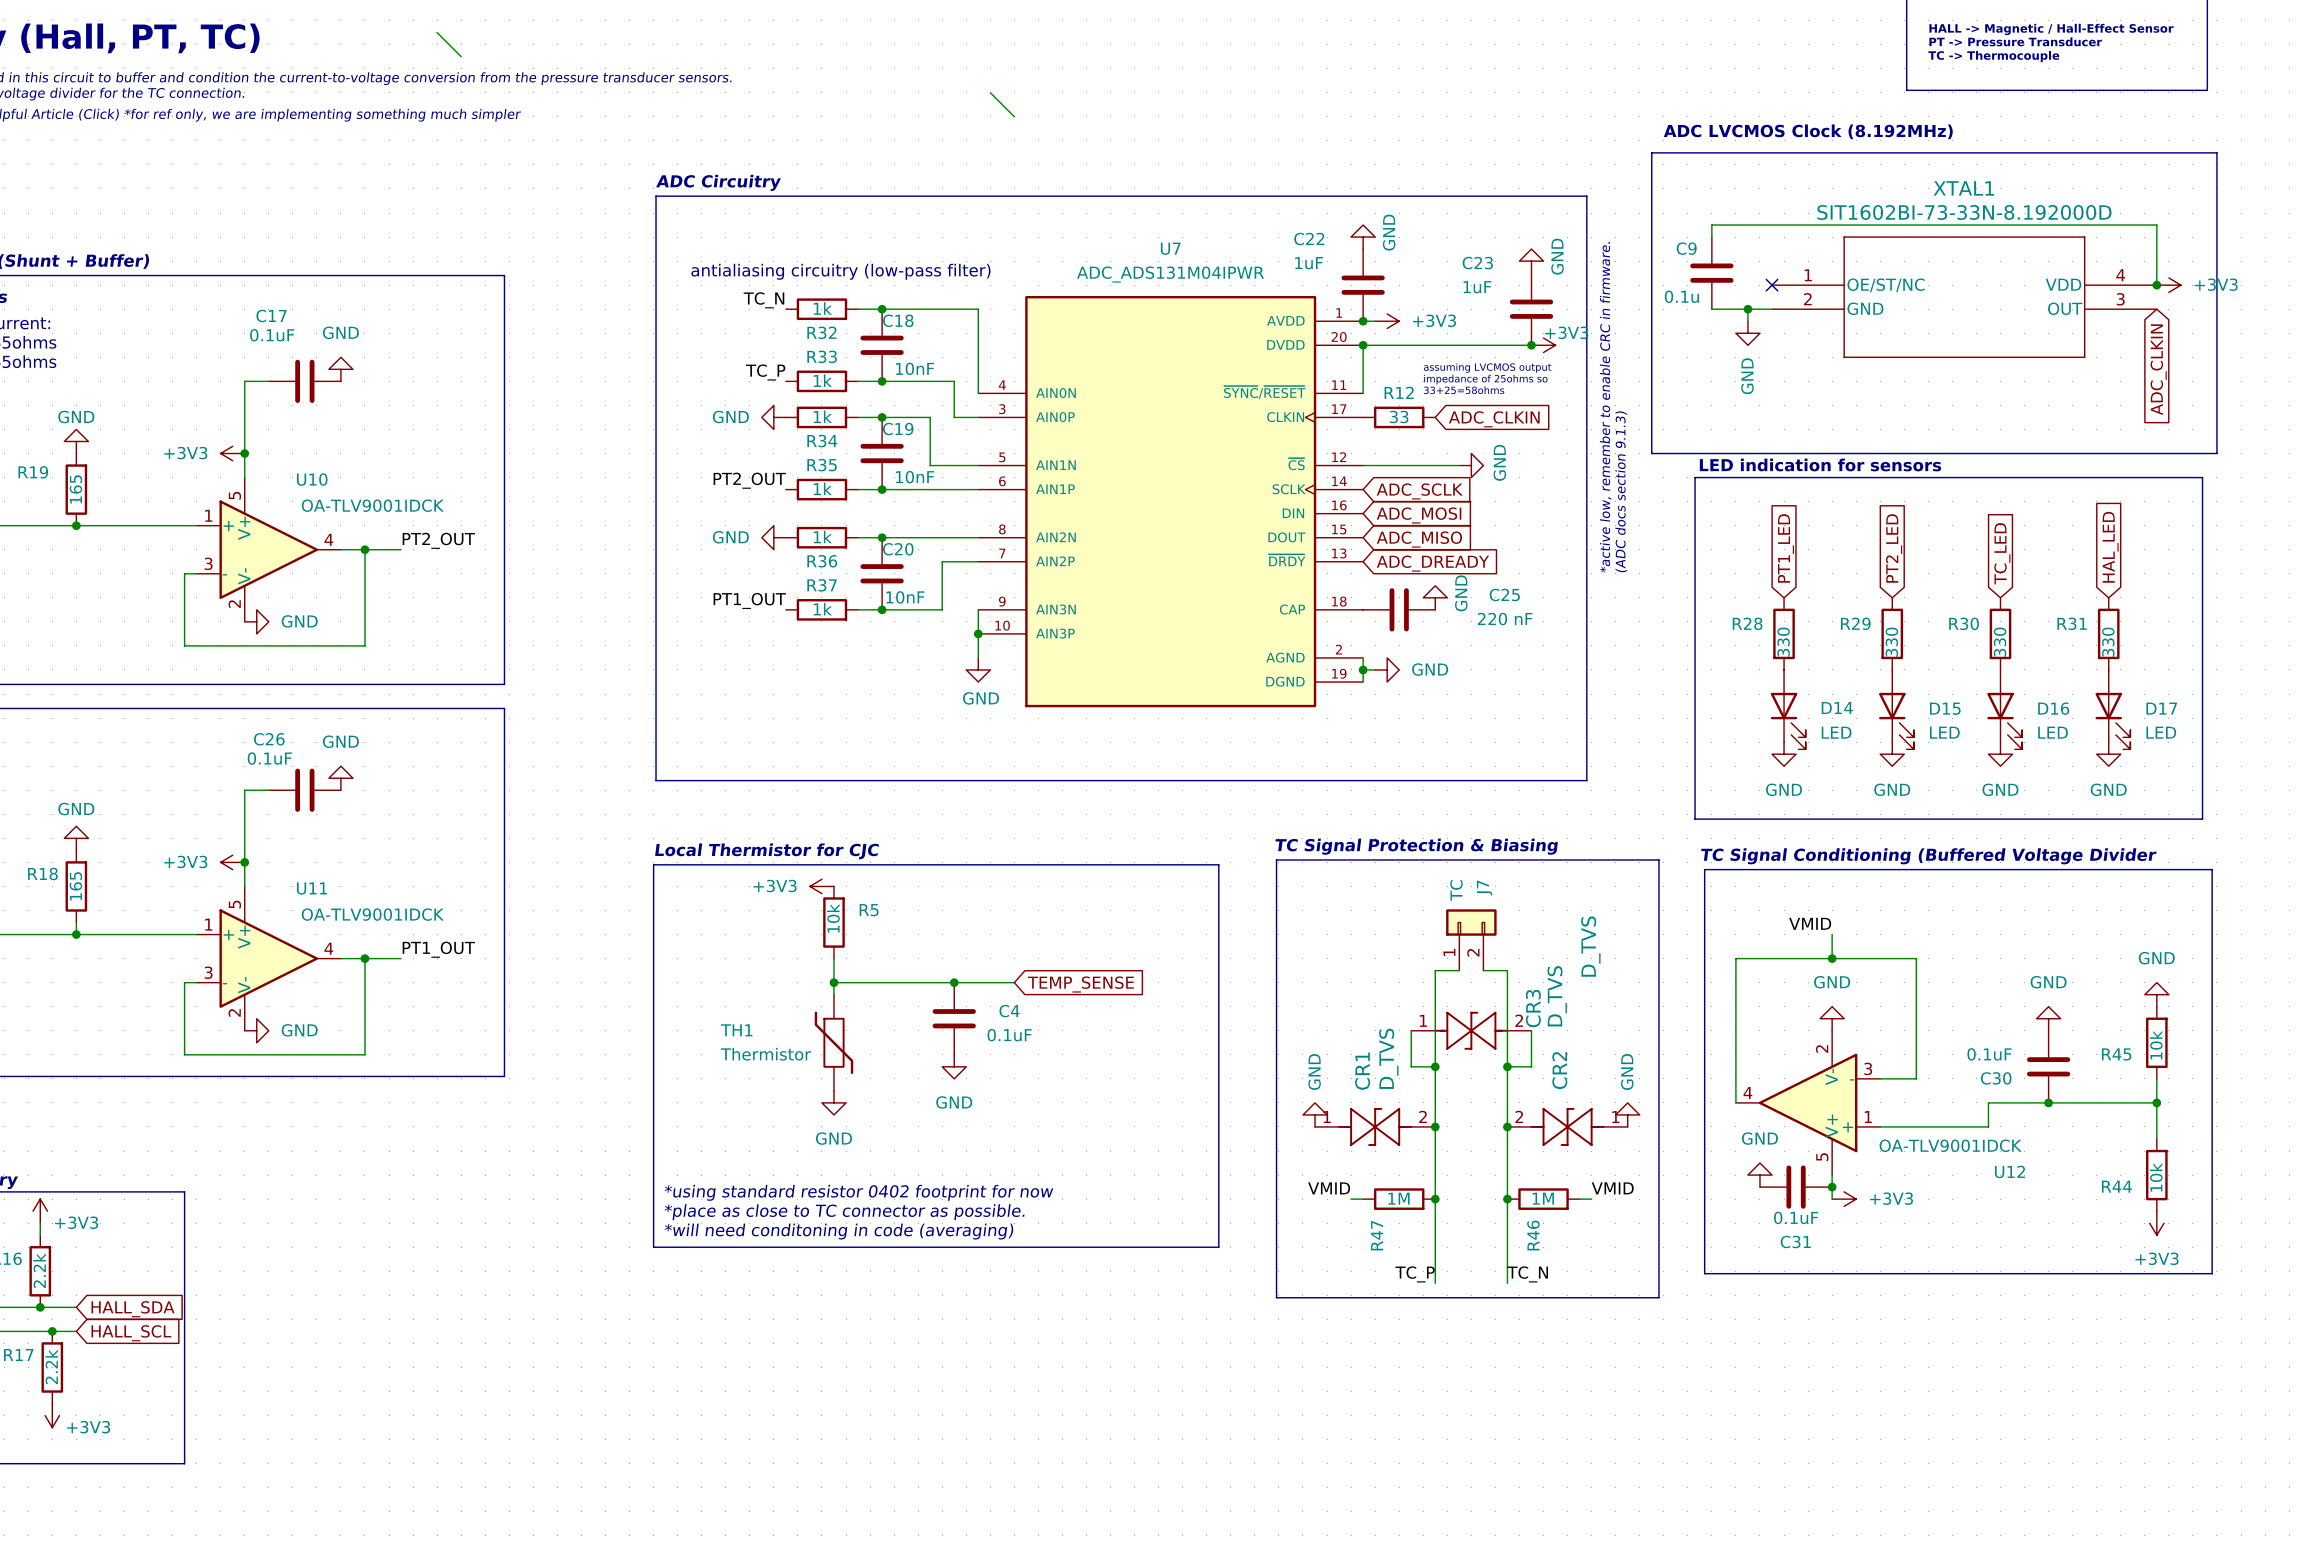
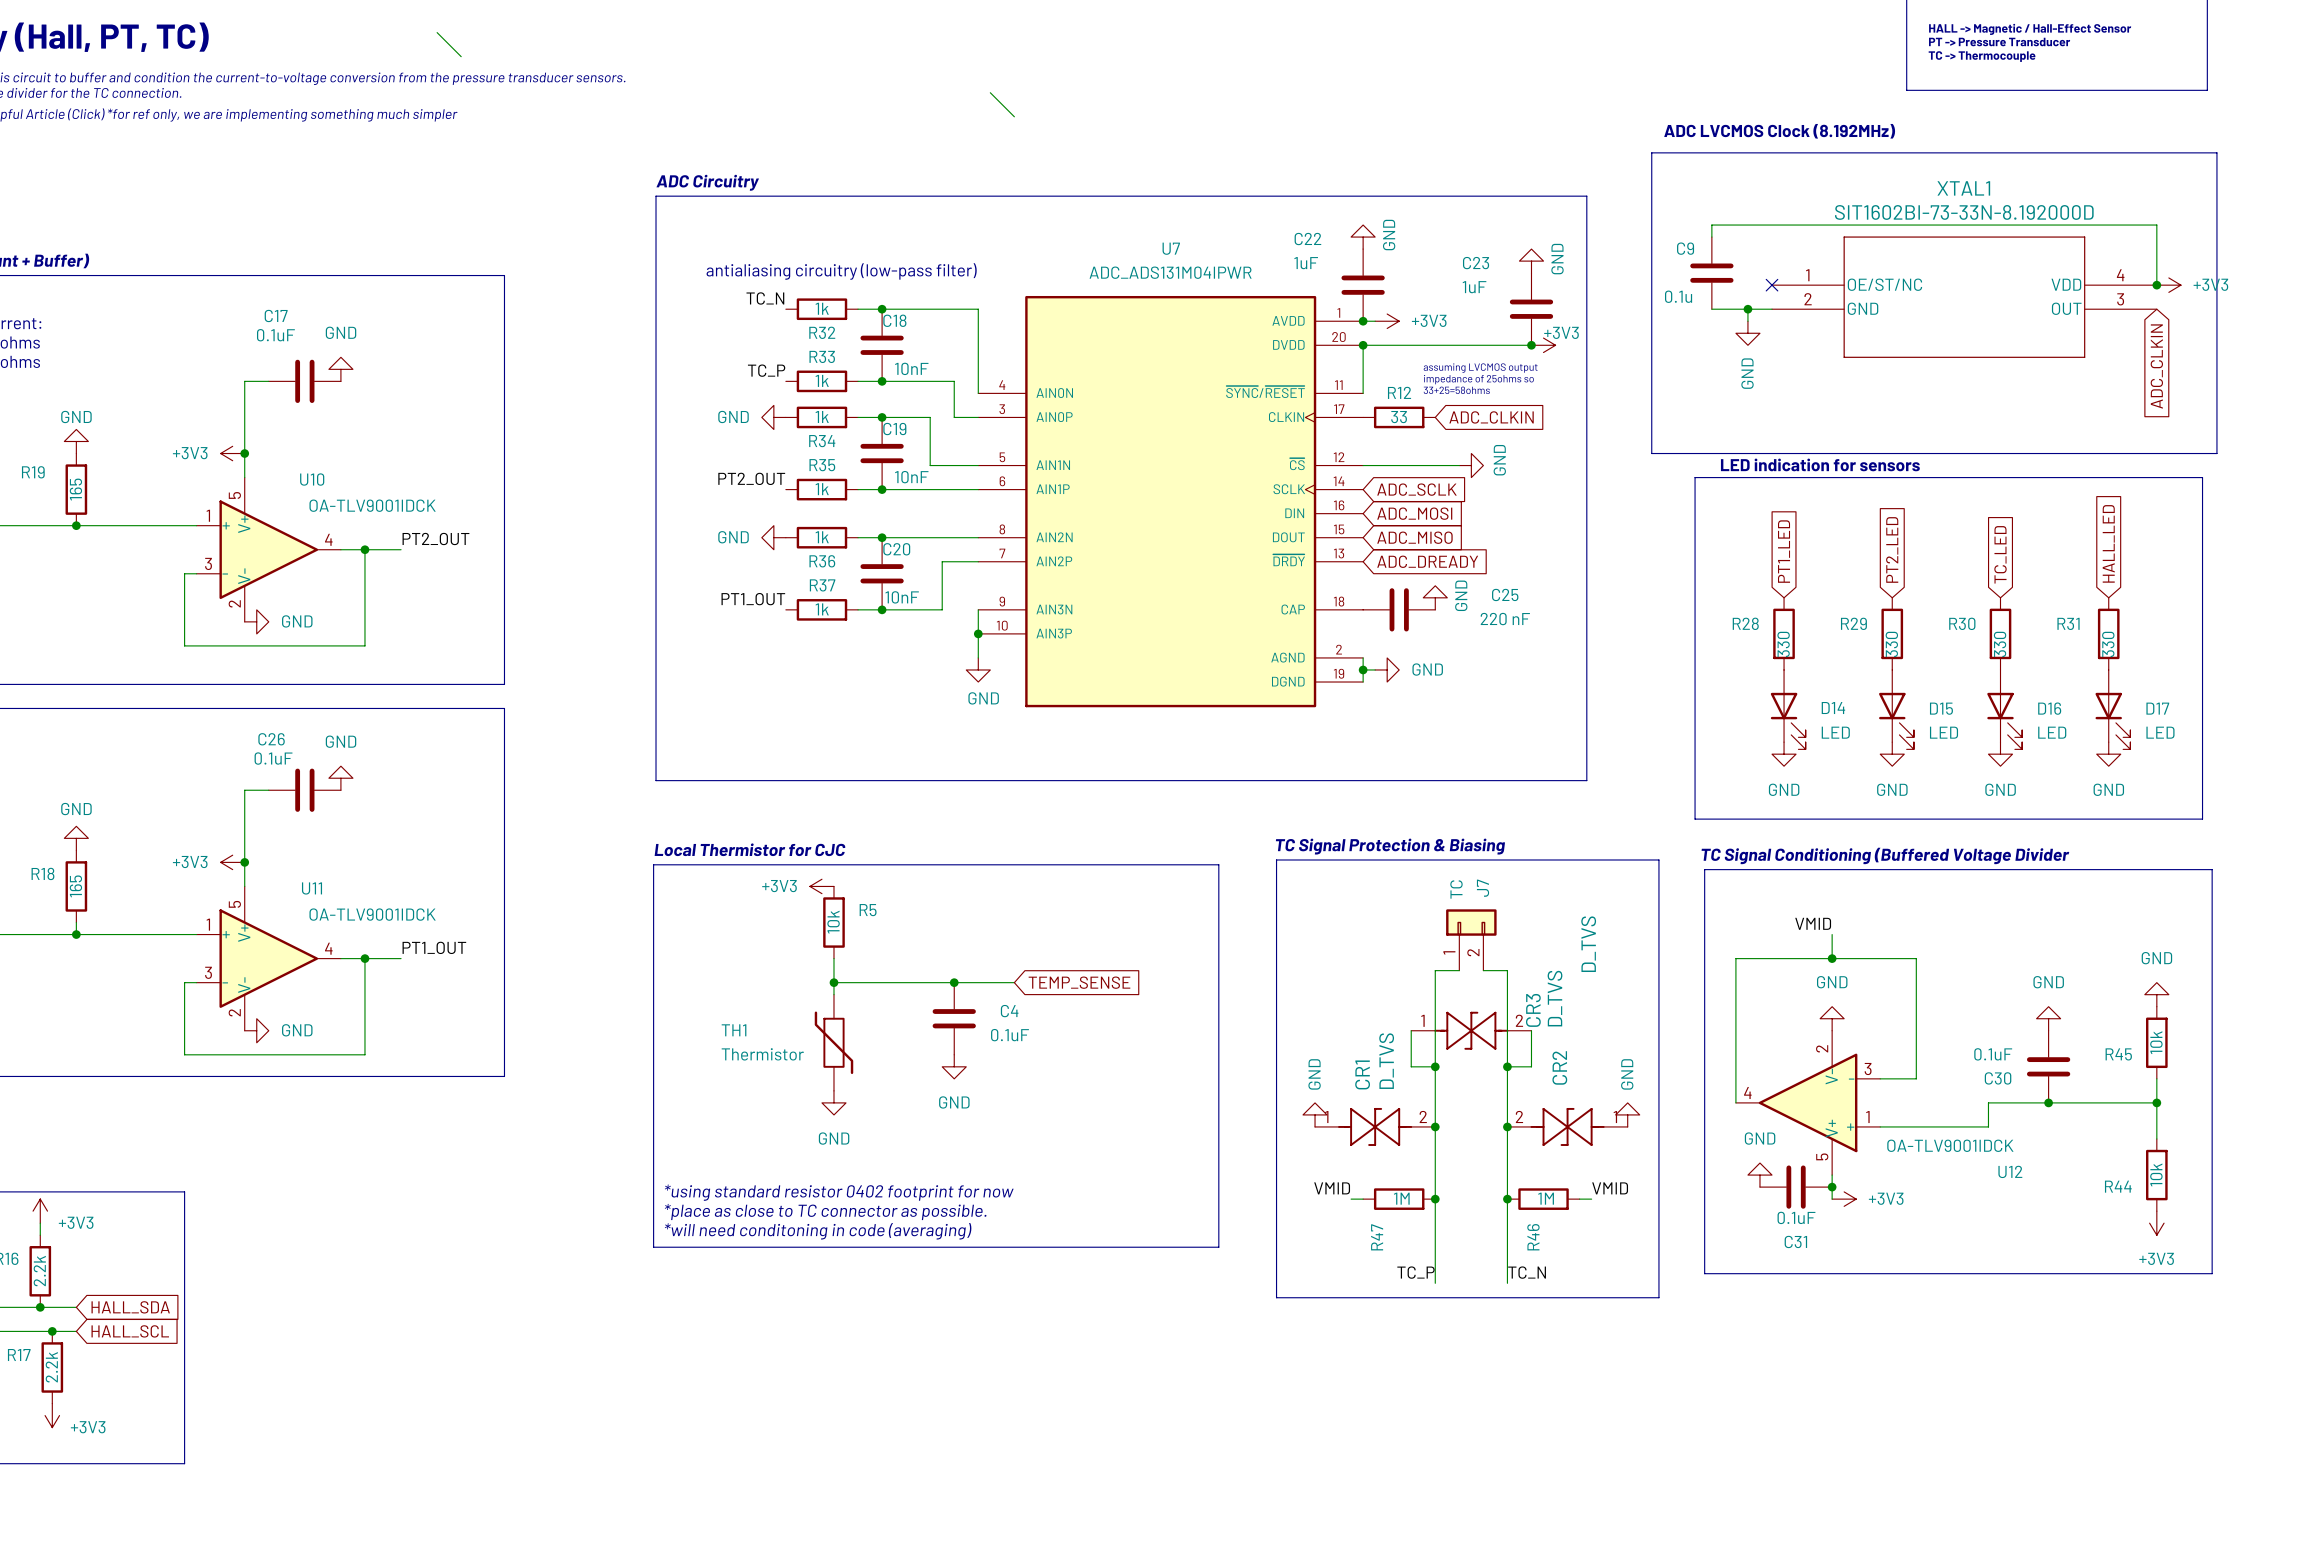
text: *active low, remember to enable CRC in firmware. (1605, 407) -> none
text: (ADC docs section 9.1.3) (1621, 491) -> none
global label: HAL_LED (2110, 547) -> HALL_LED (2108, 543)

